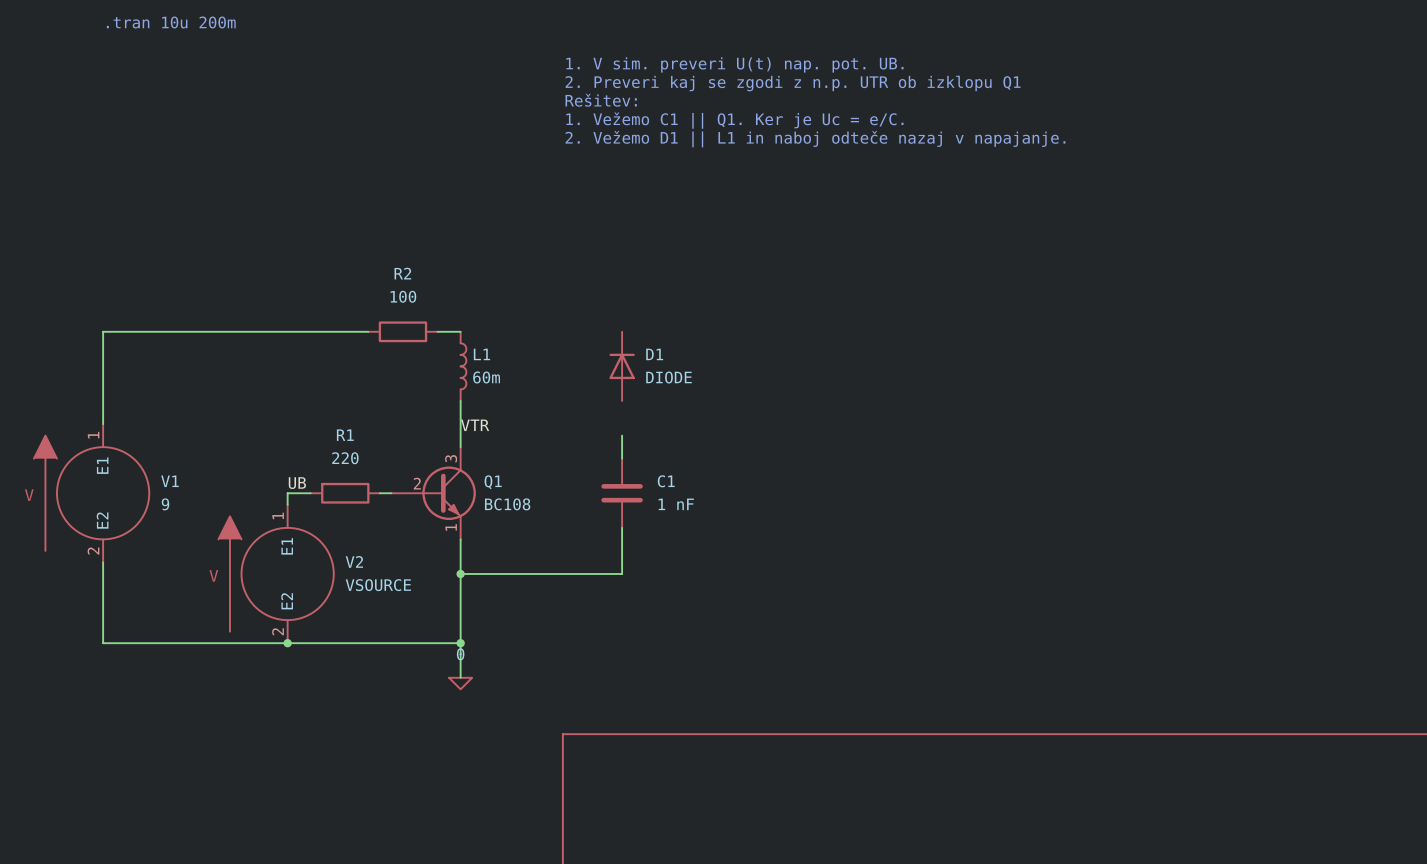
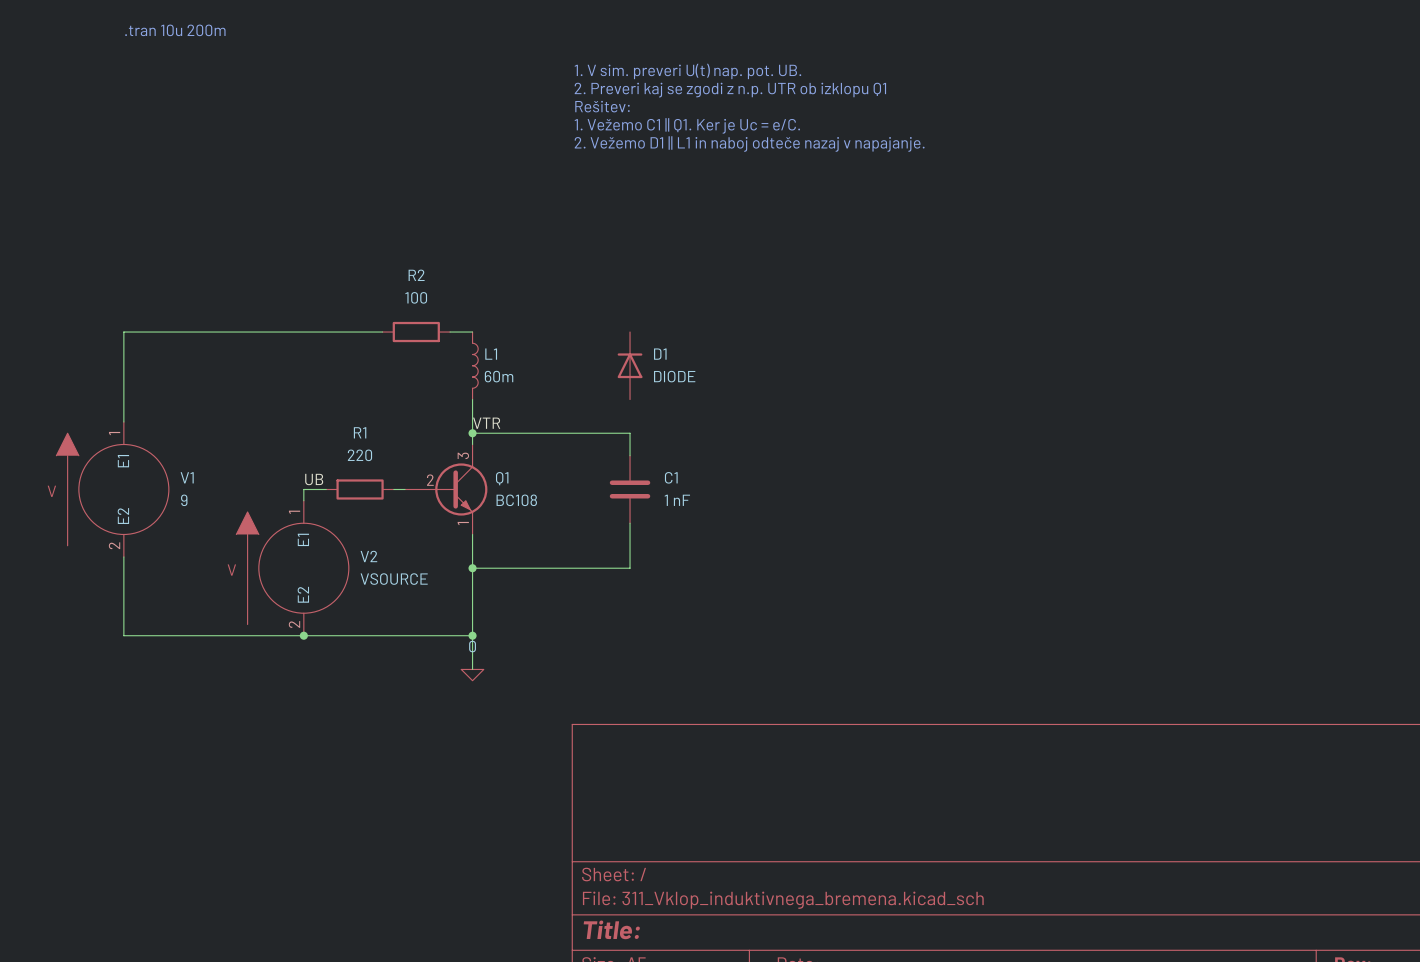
wire: none -> (472, 433) (630, 433)
junction: none -> (472, 433)

